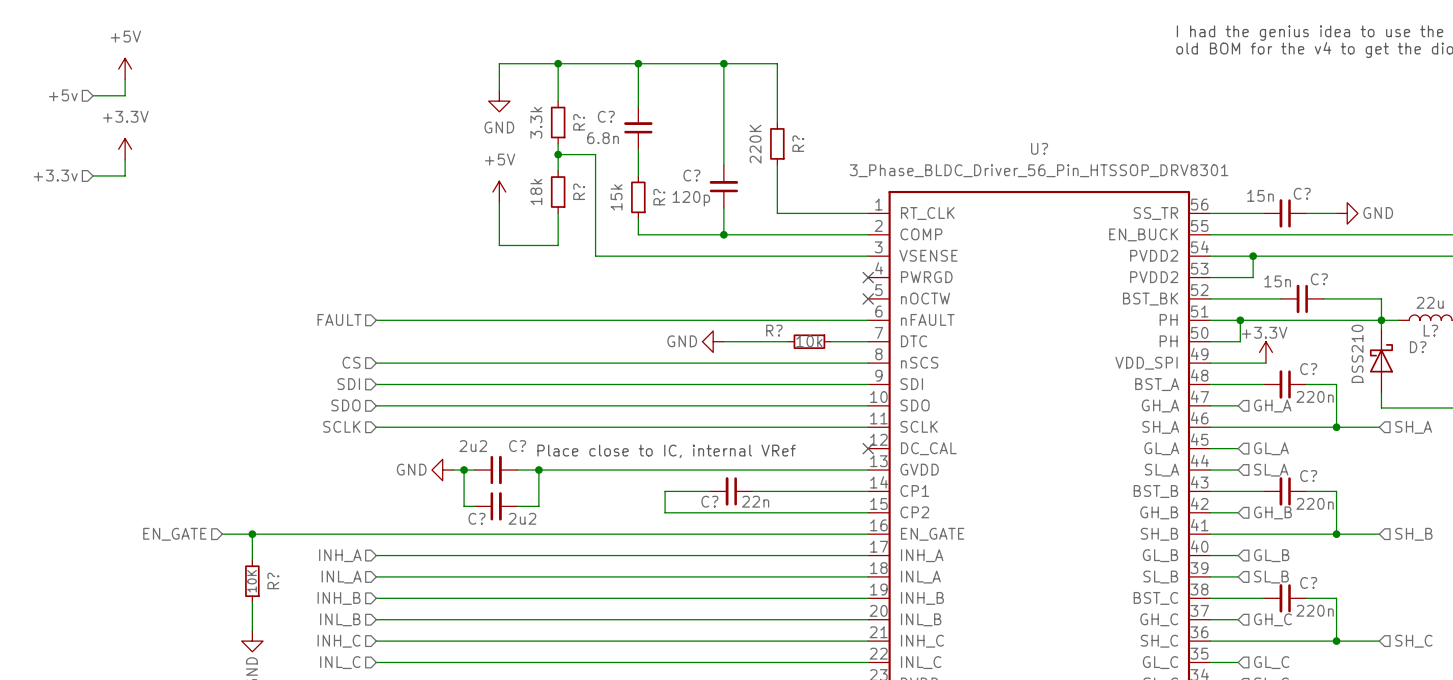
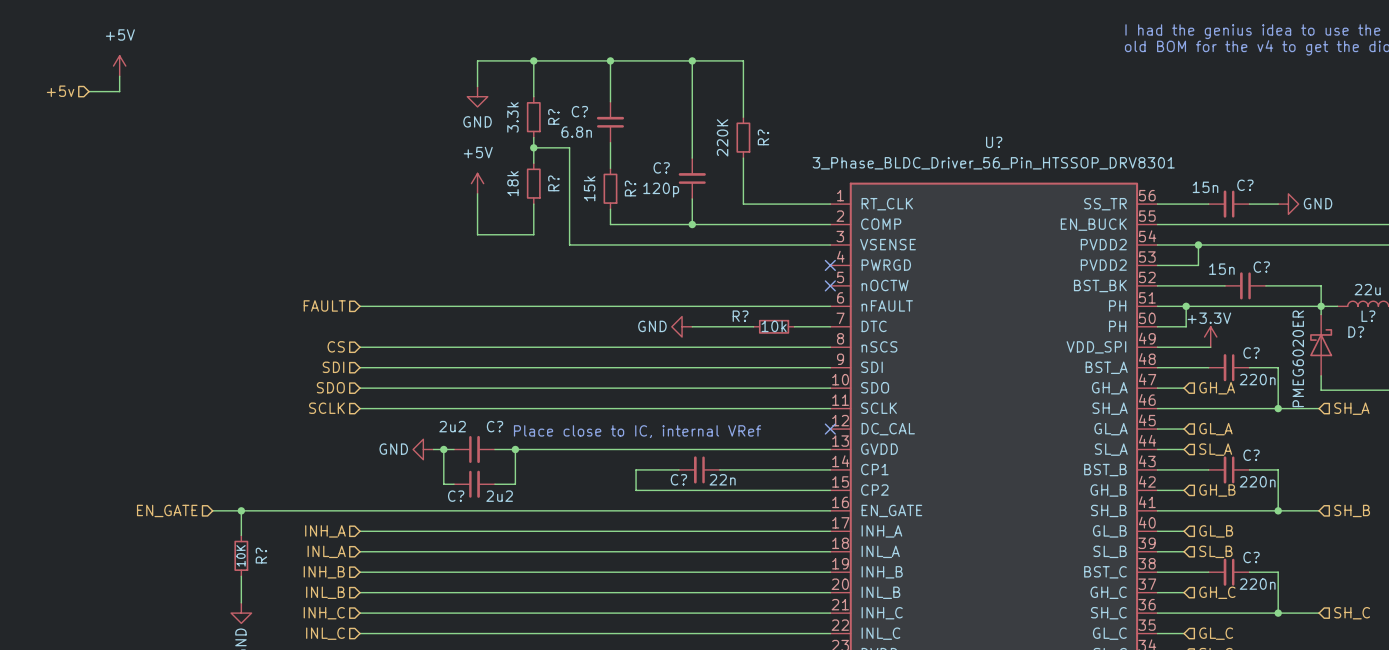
power symbol: +3.3V (125, 149) -> none
wire: (125, 159) (125, 175) (93, 175) -> none
hierarchical label: +3.3v (55, 175) -> none
D? value: DSS210 (1357, 353) -> PMEG6020ER (1298, 358)

